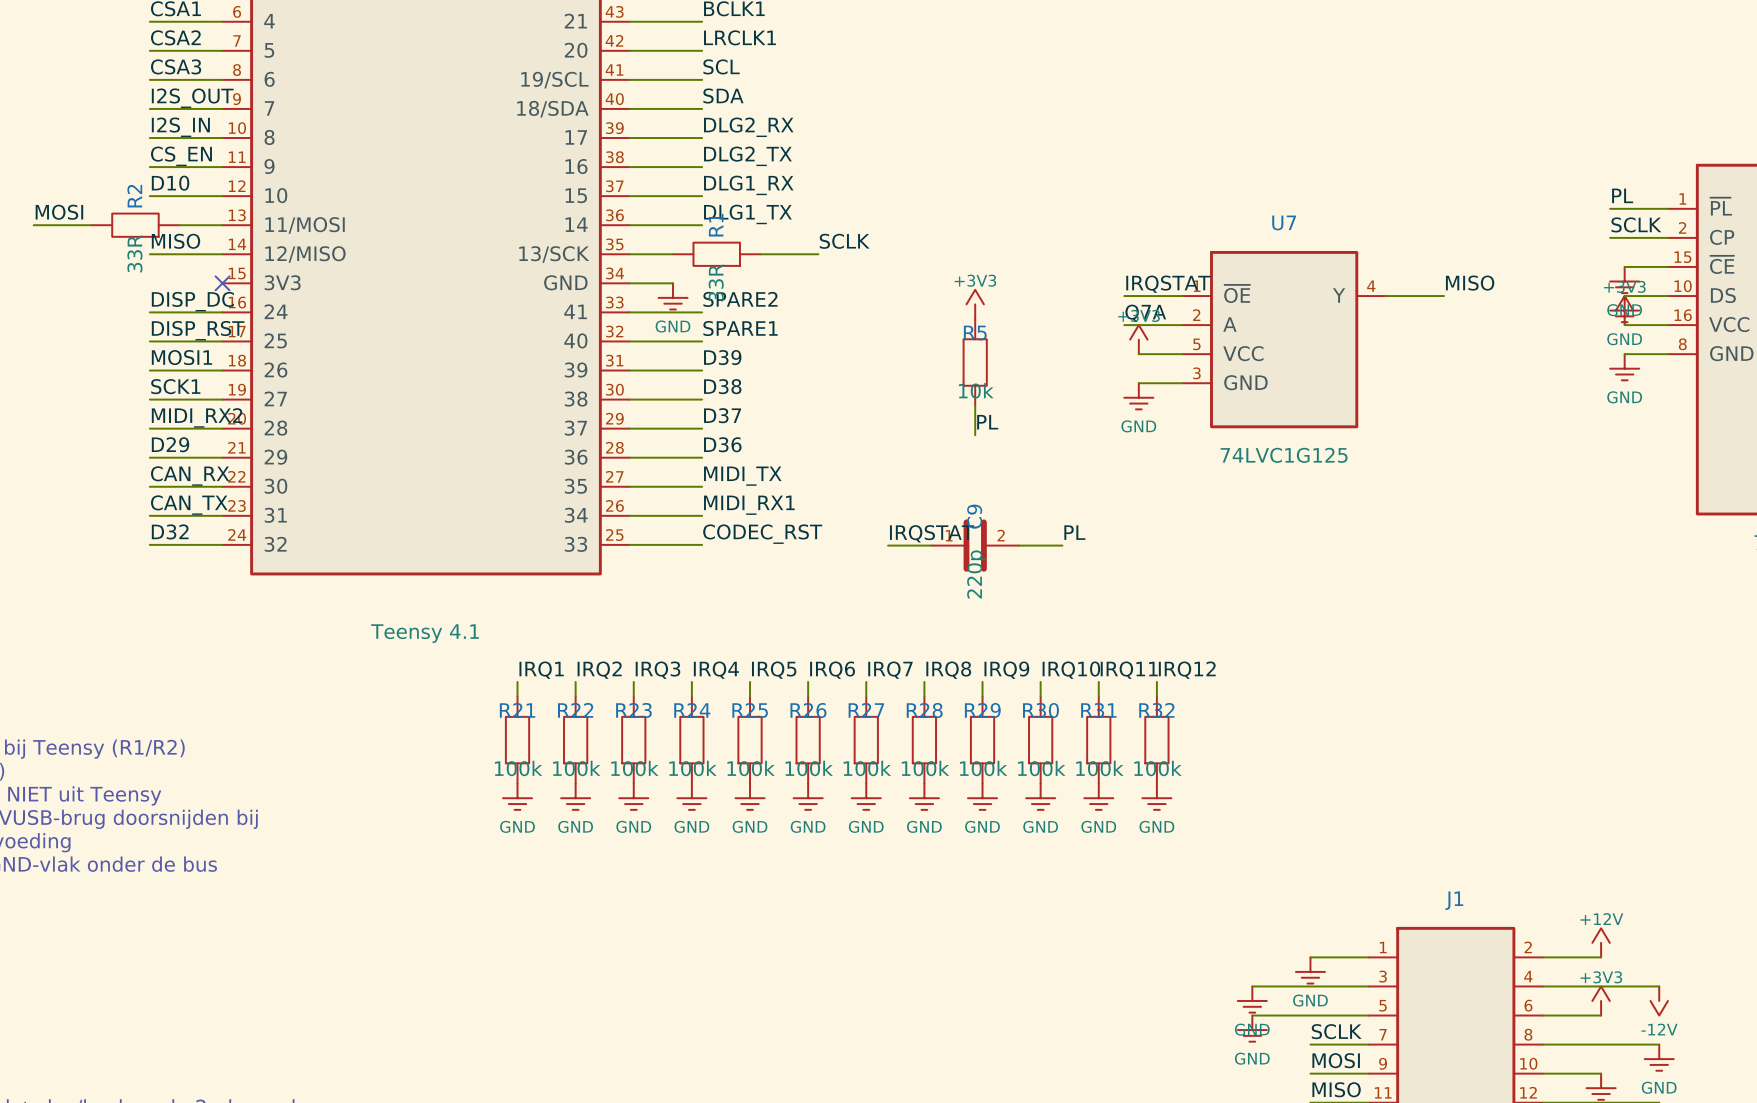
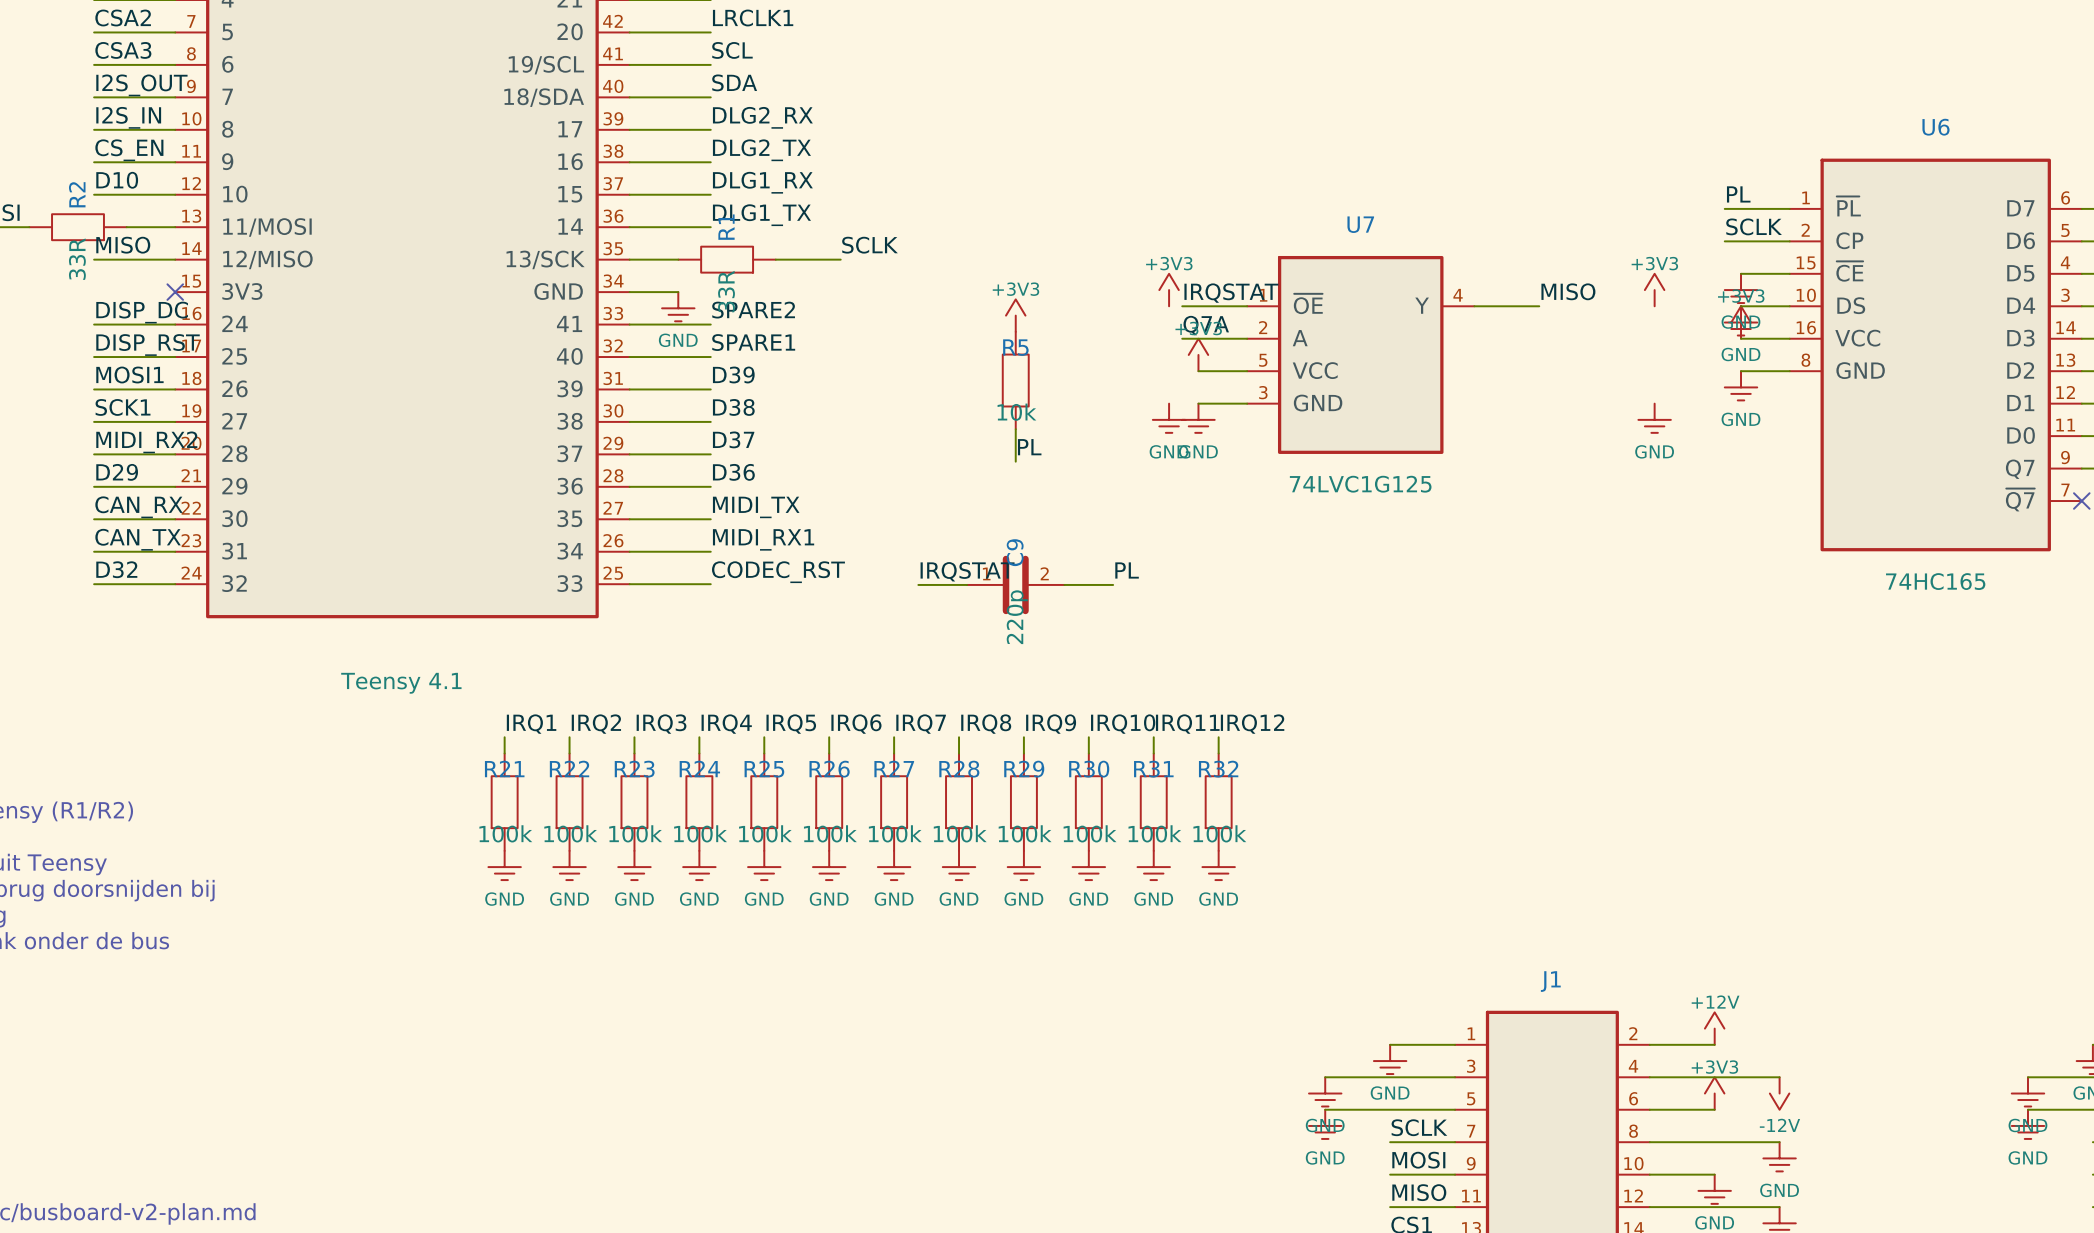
power symbol: none -> +3V3 (1169, 290)
power symbol: none -> +3V3 (1654, 290)
power symbol: none -> GND (1169, 418)
power symbol: none -> GND (1654, 418)

